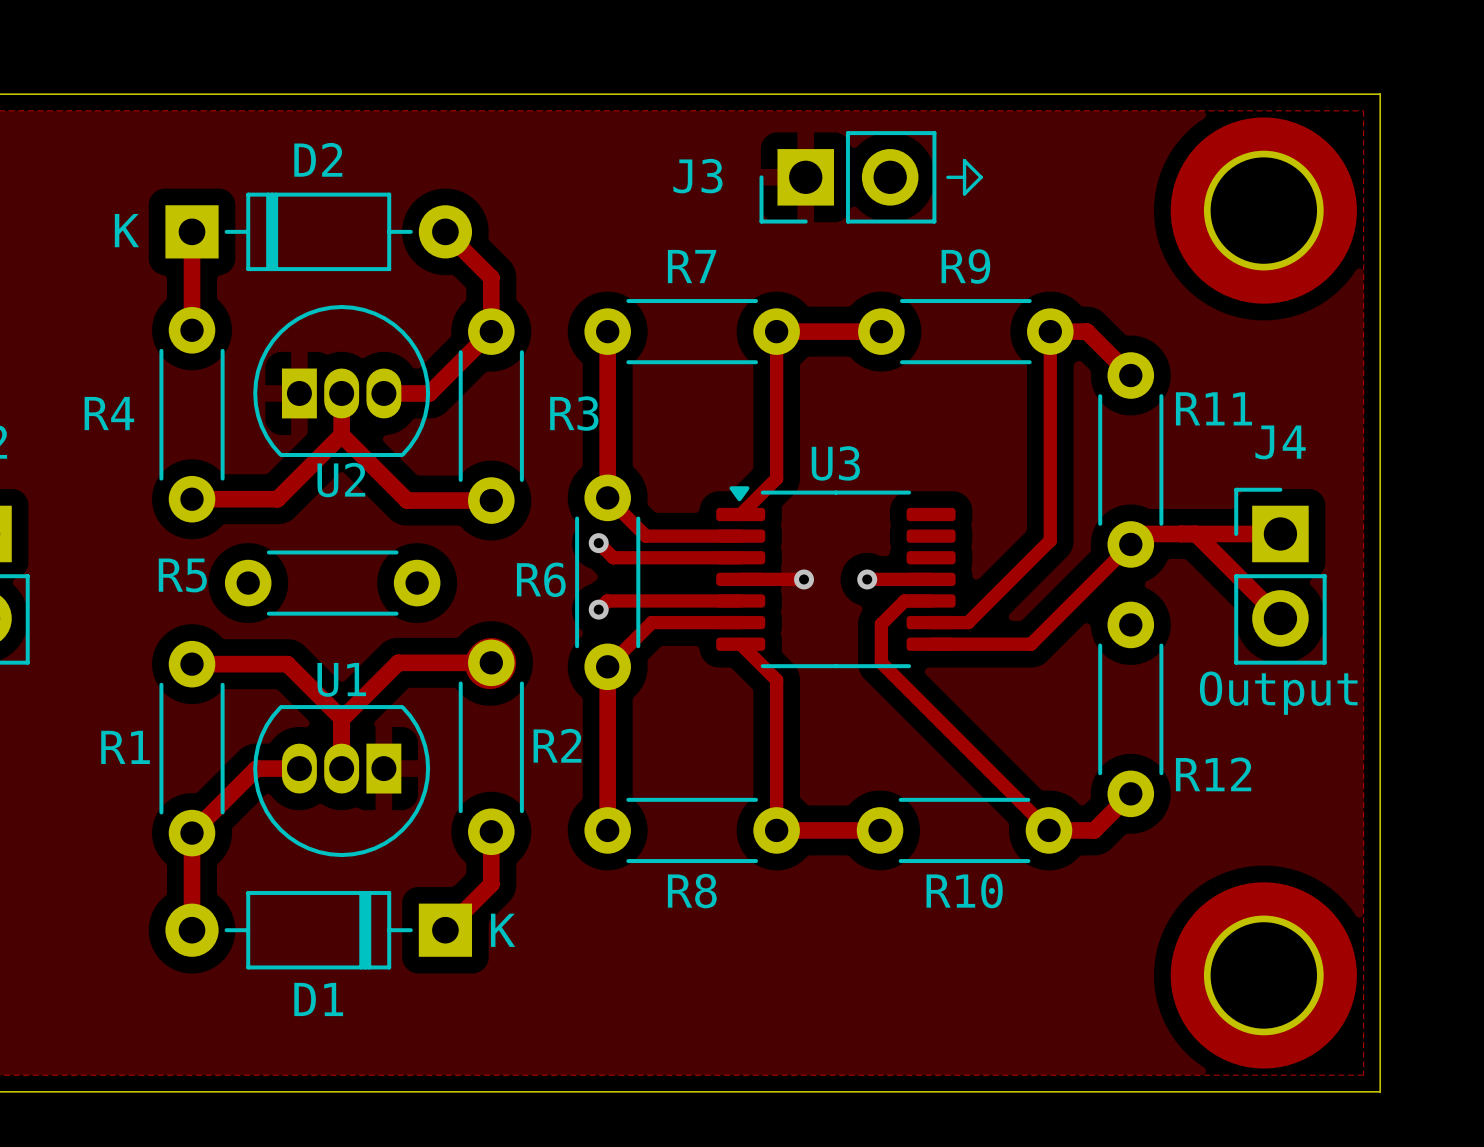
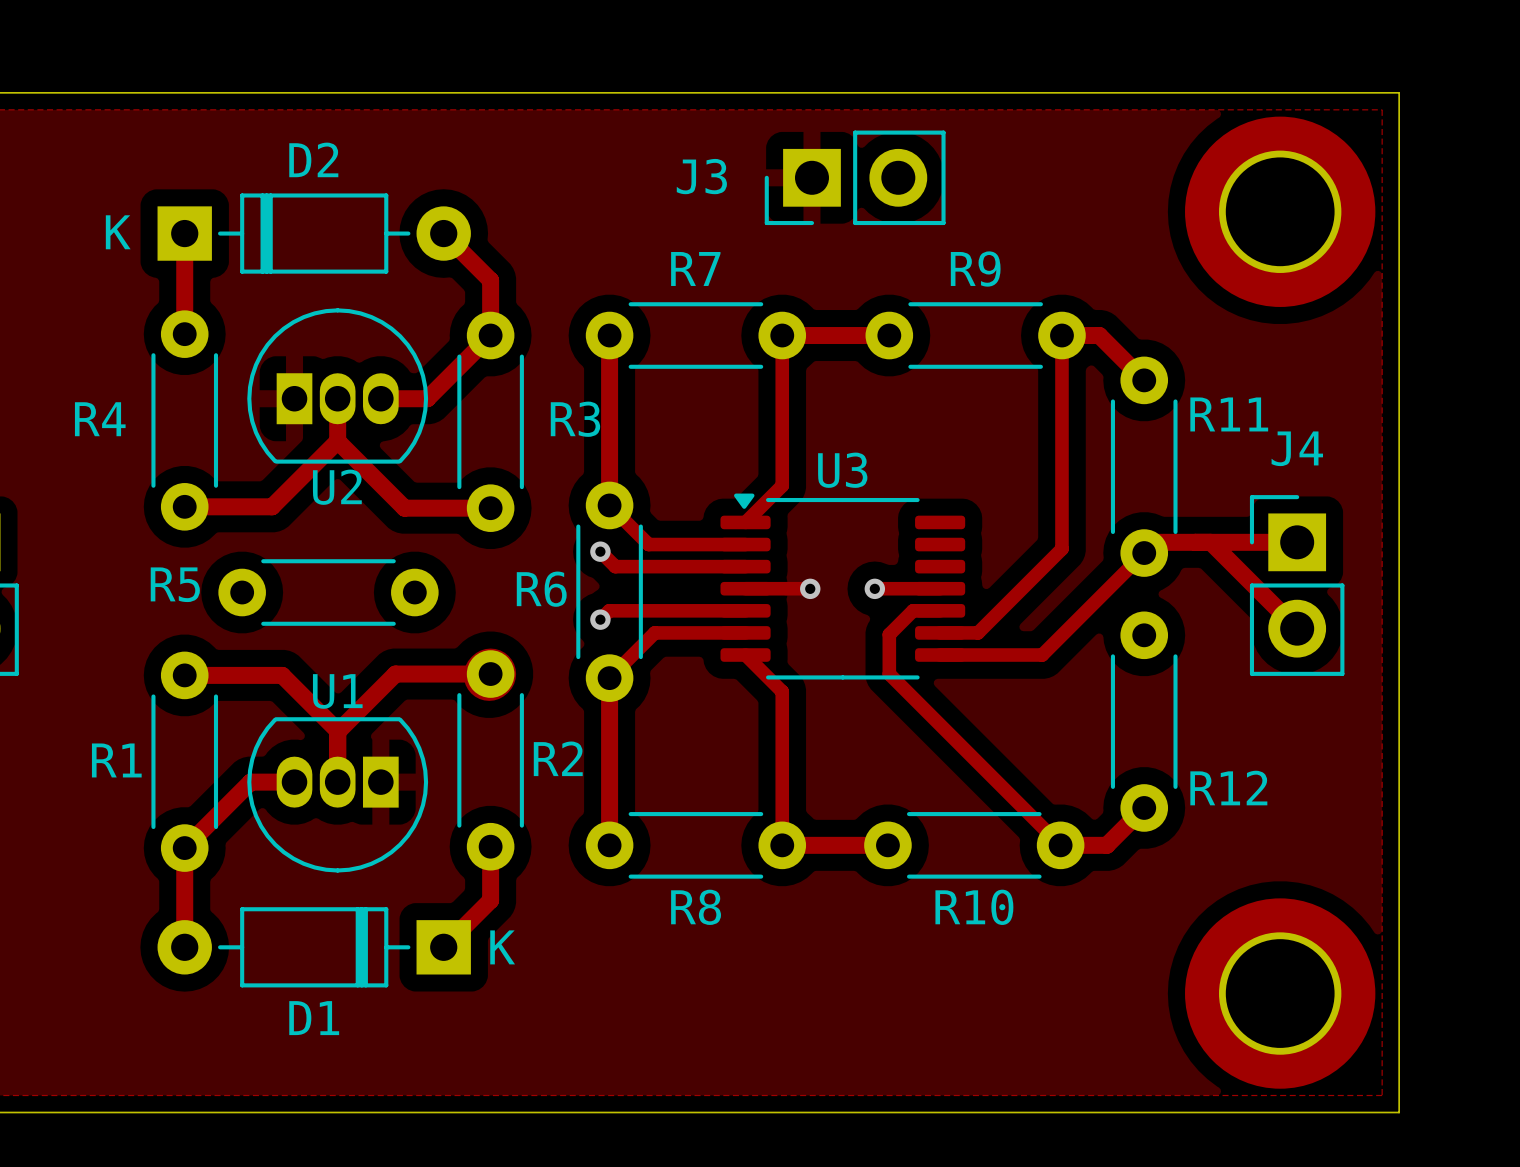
line: (964, 160) (964, 193) (981, 177) (964, 160) -> none
line: (947, 177) (964, 177) -> none
text: Output (1278, 693) -> none

